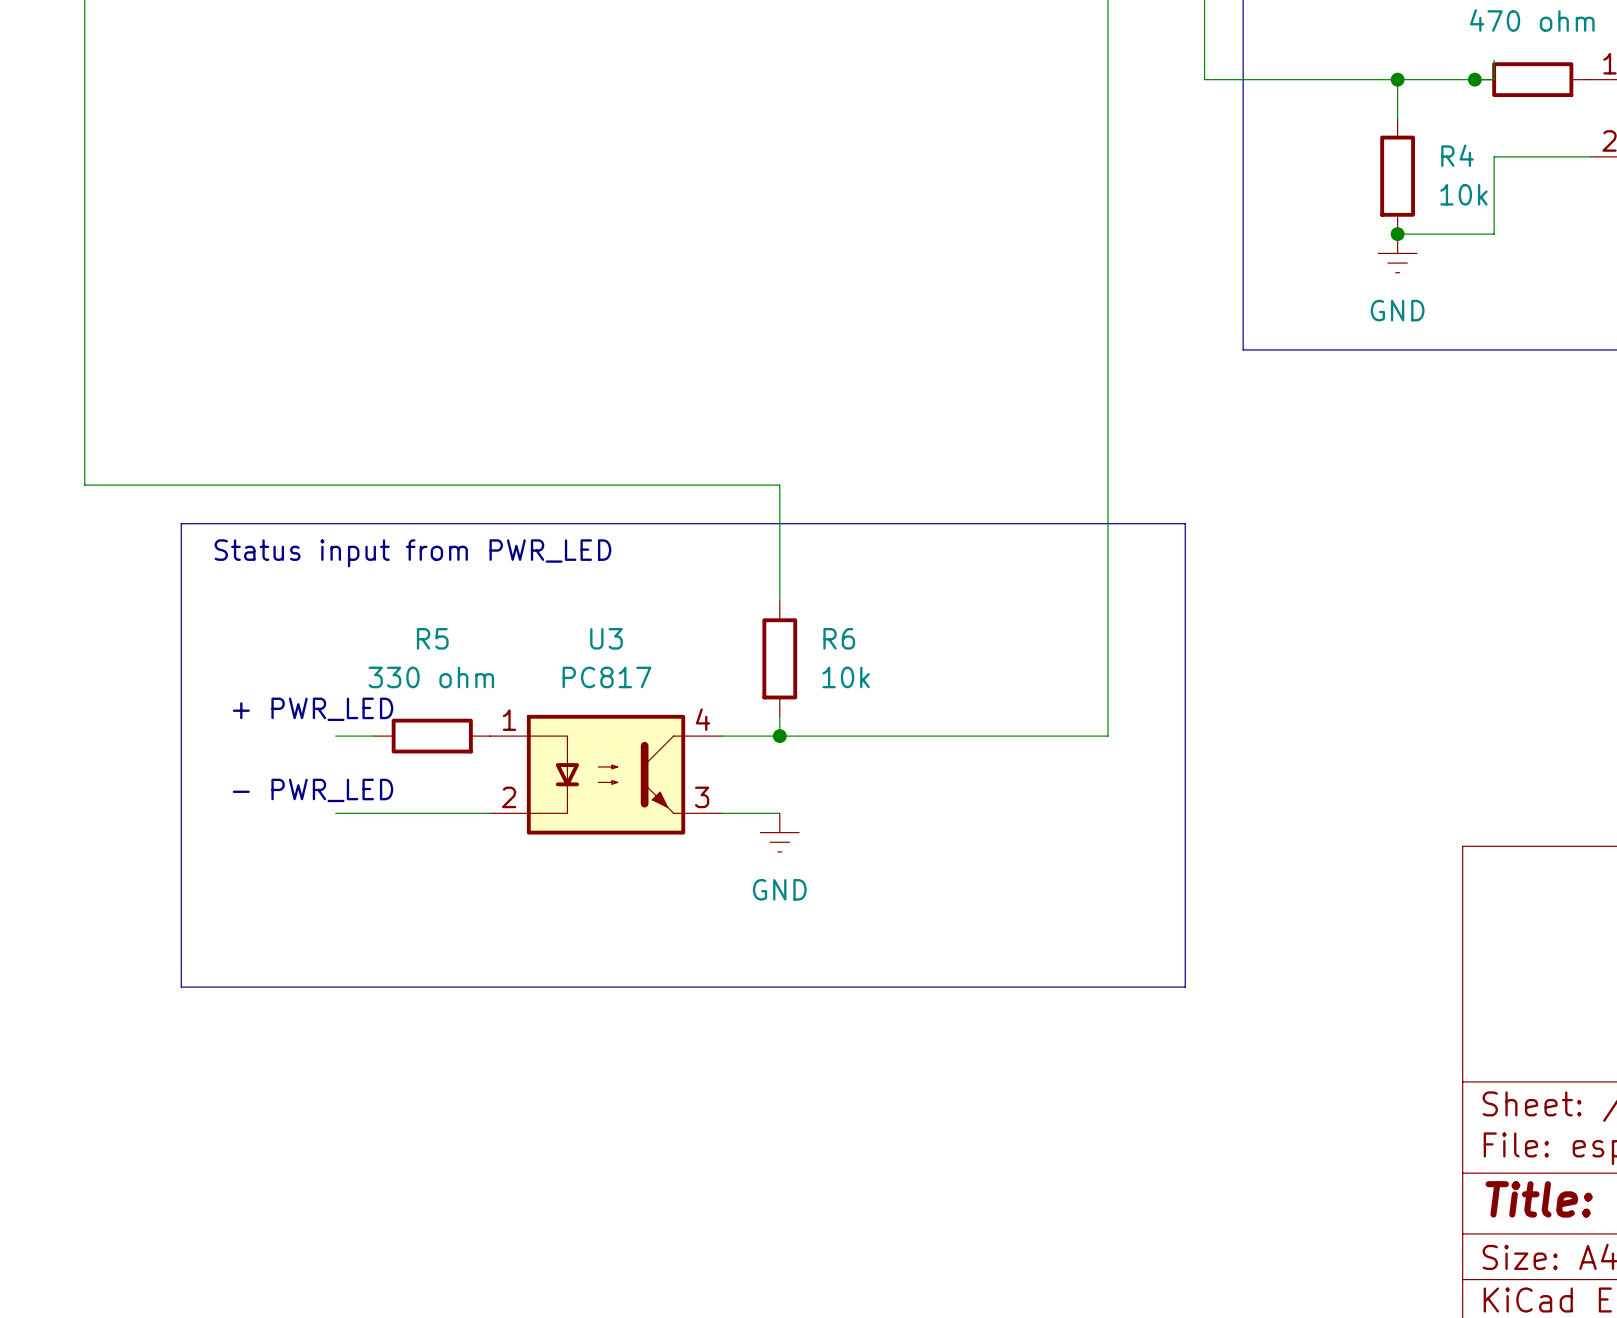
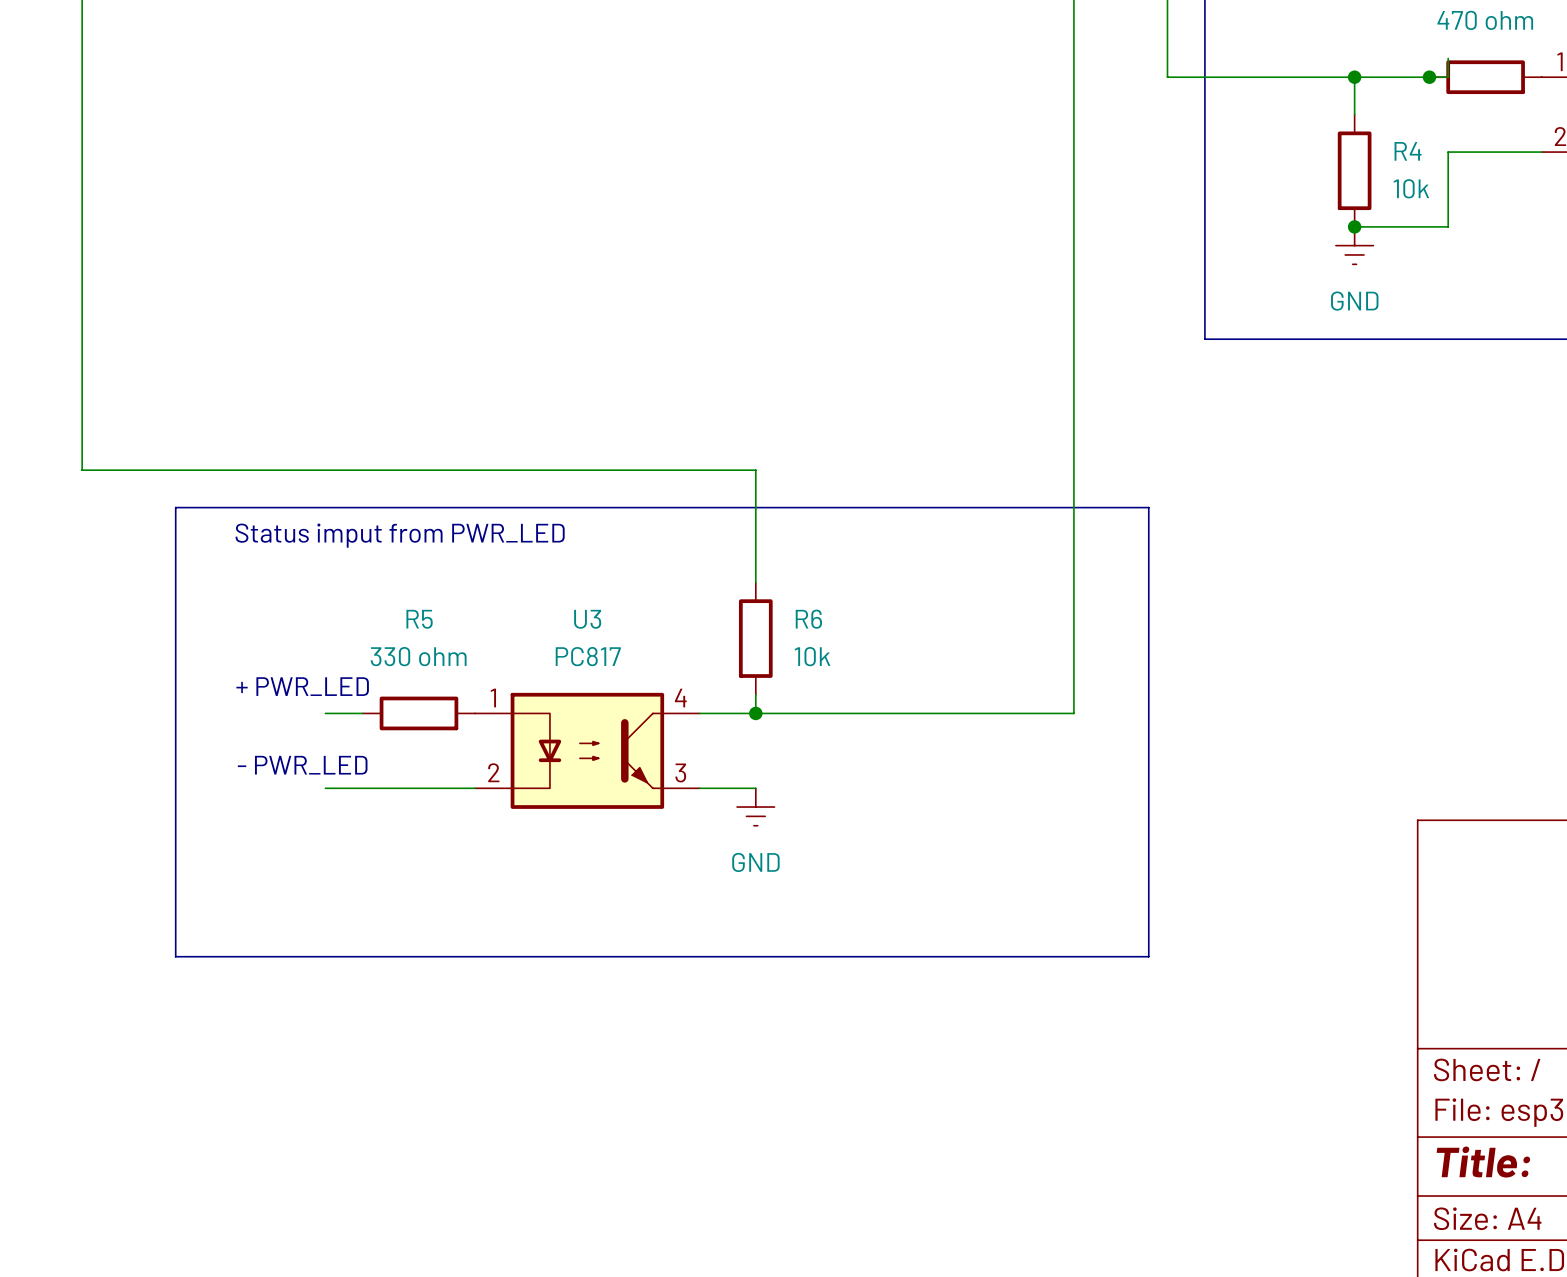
text: Status input from PWR_LED (412, 553) -> Status imput from PWR_LED (400, 535)

